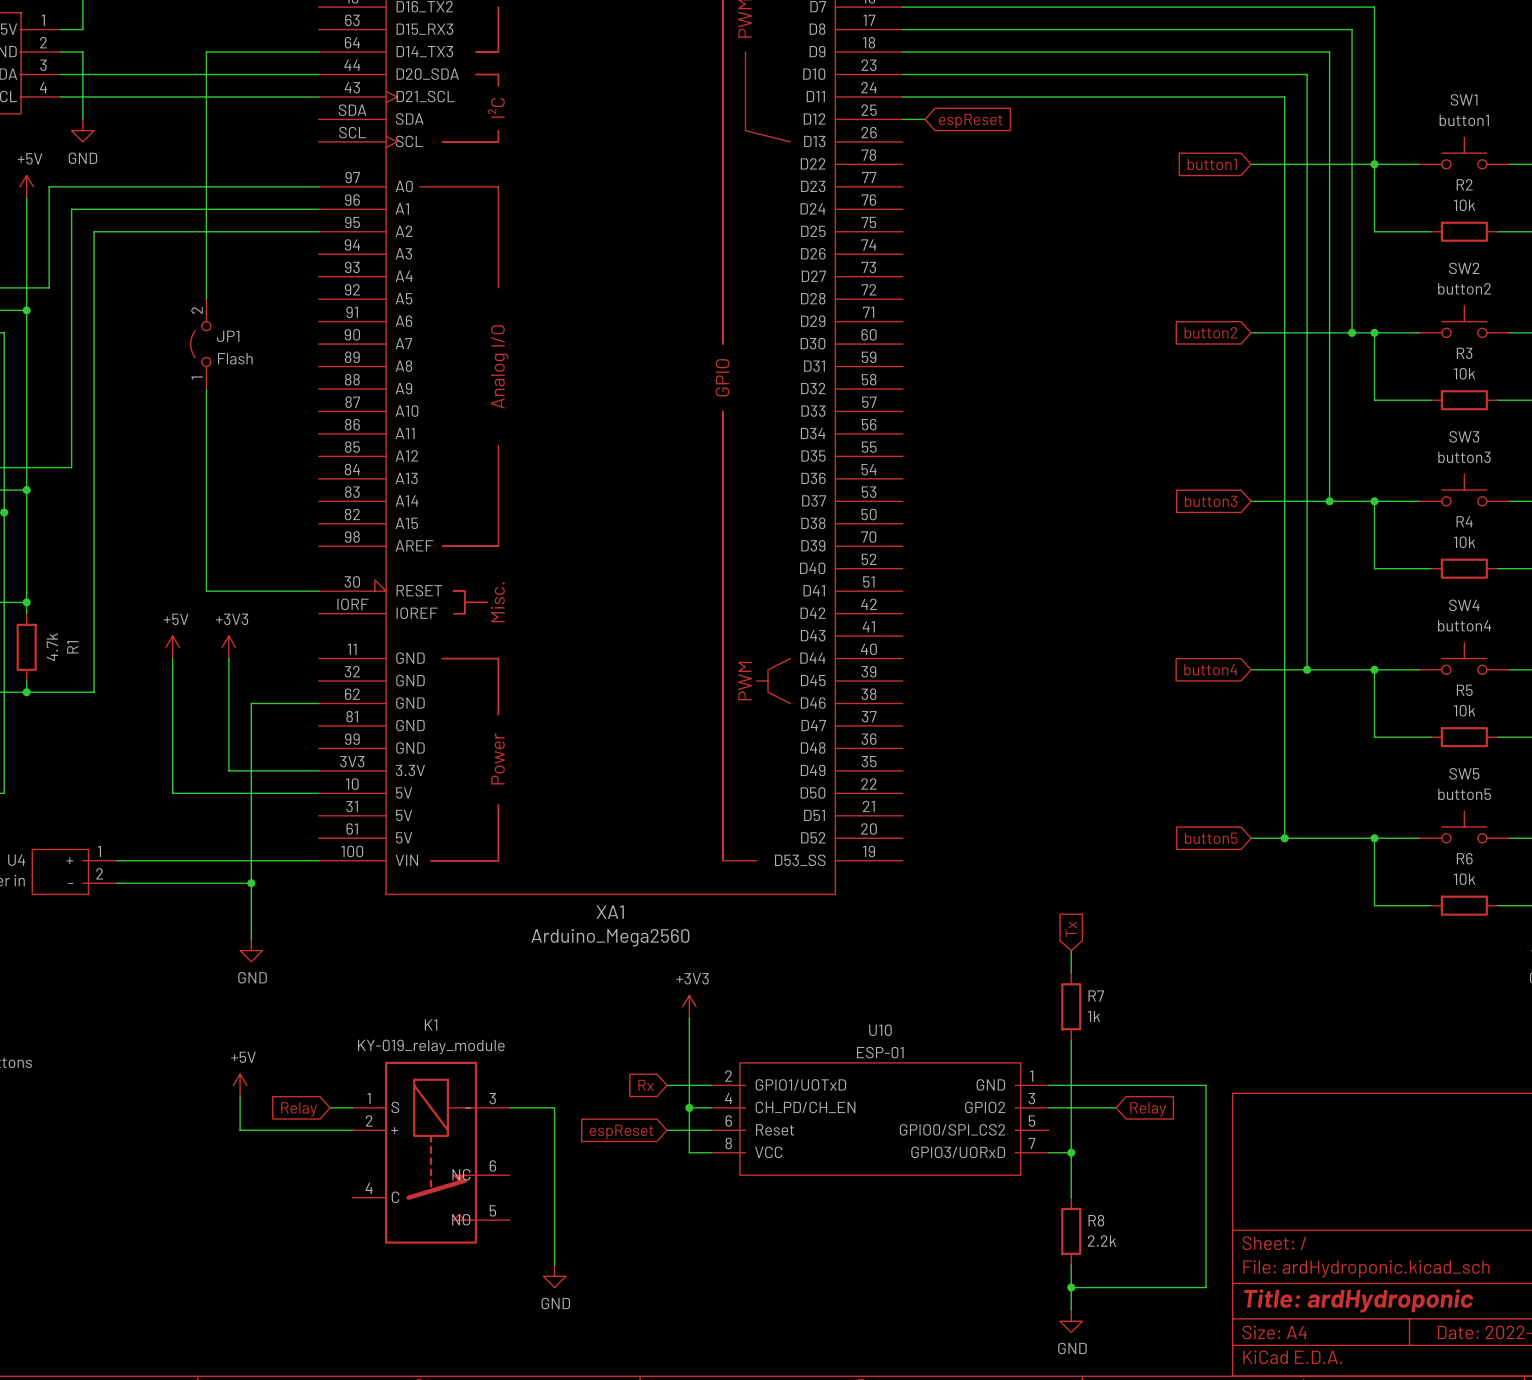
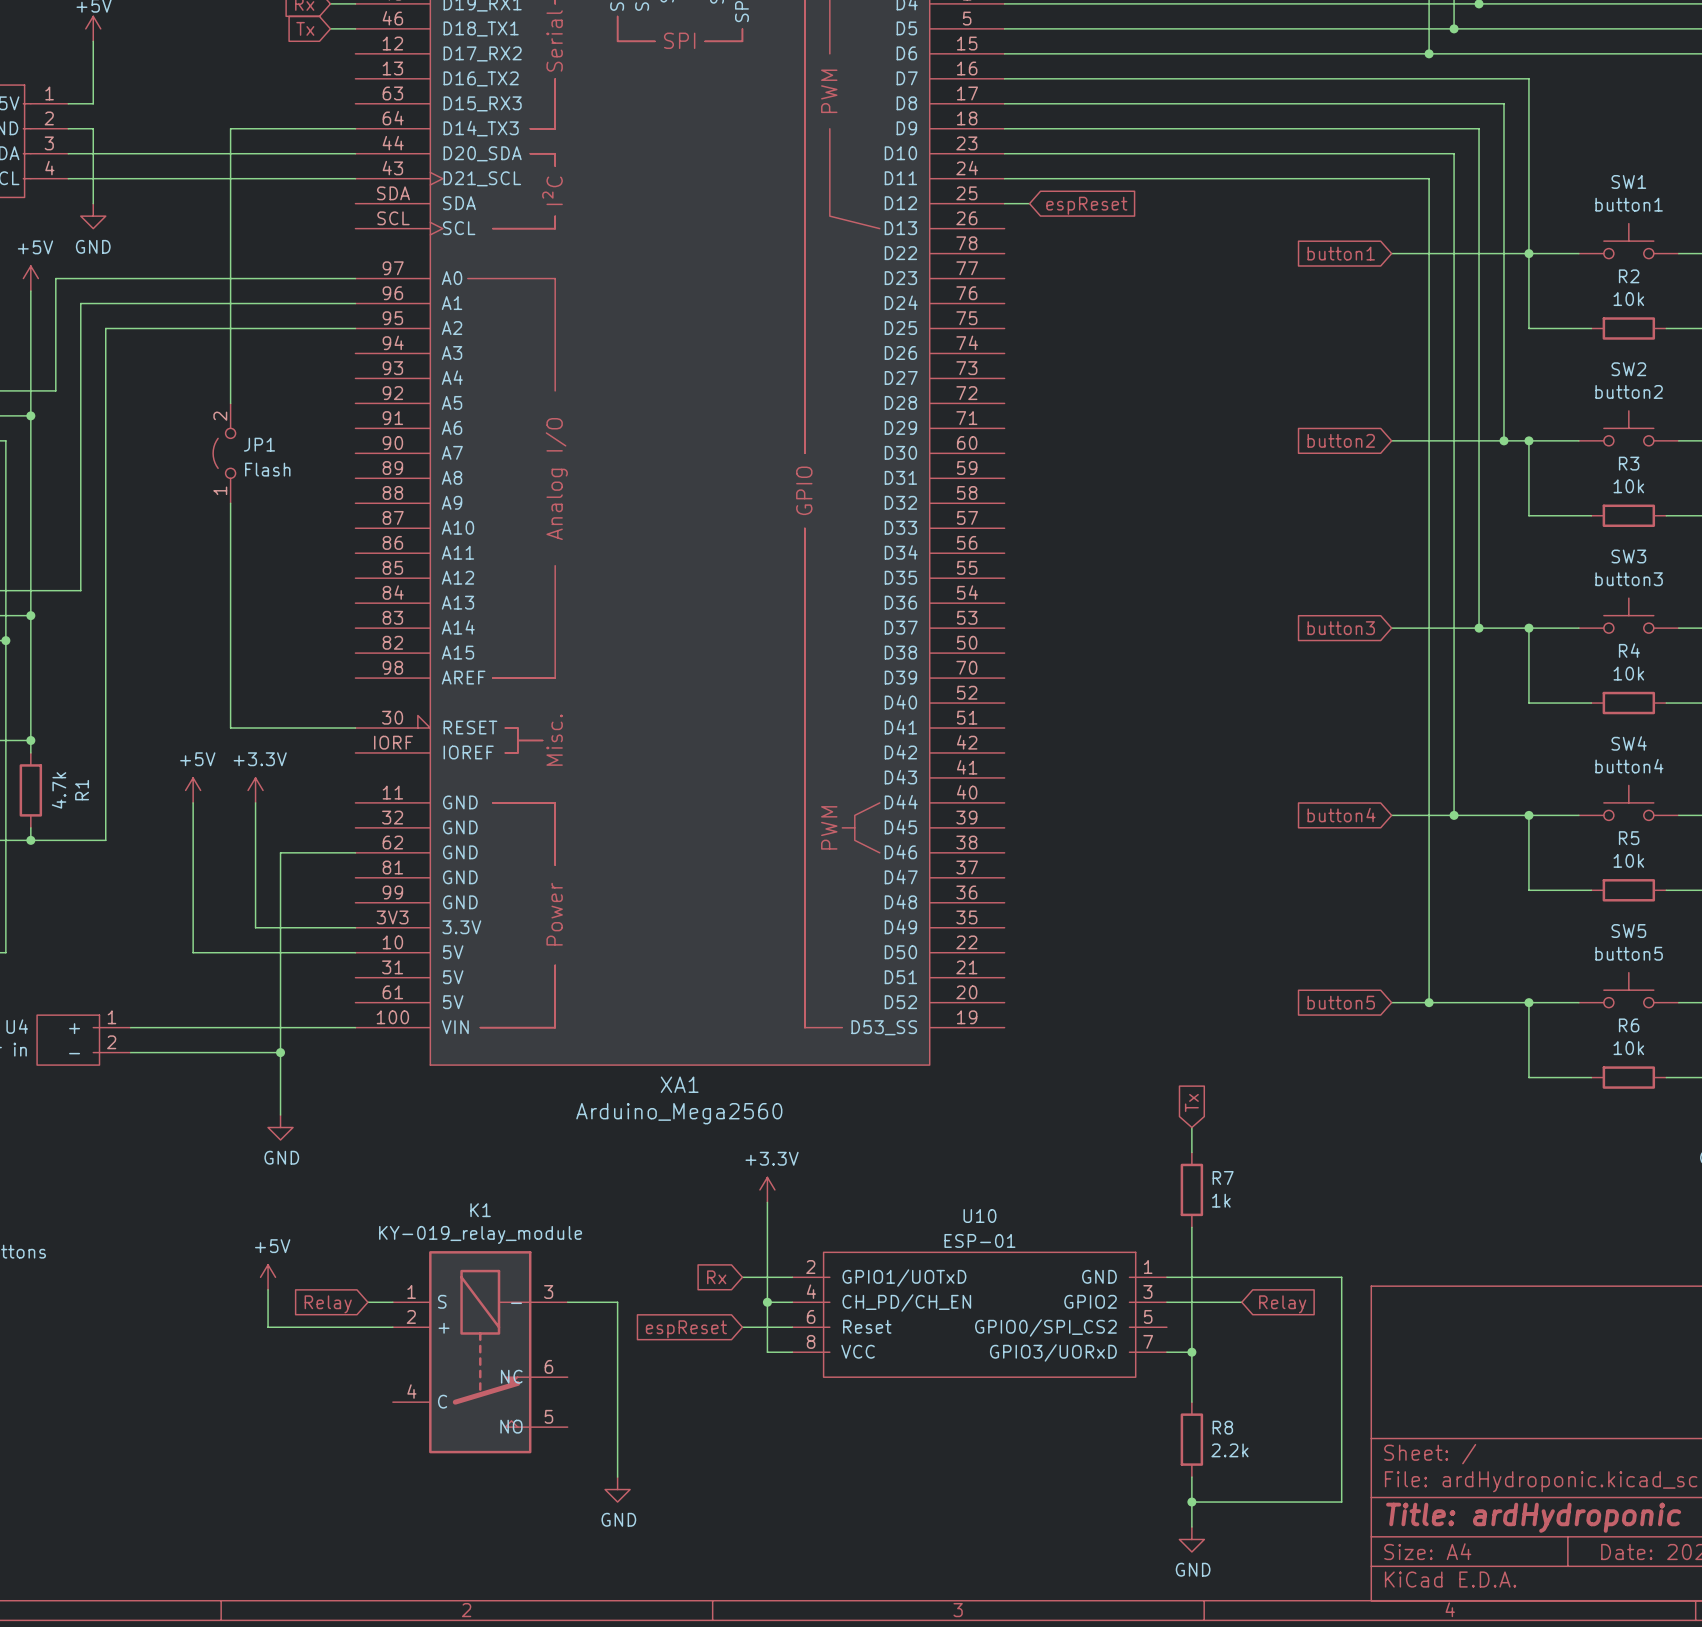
power symbol: +3V3 (228, 647) -> +3.3V (255, 790)
power symbol: +3V3 (689, 1006) -> +3.3V (767, 1189)

